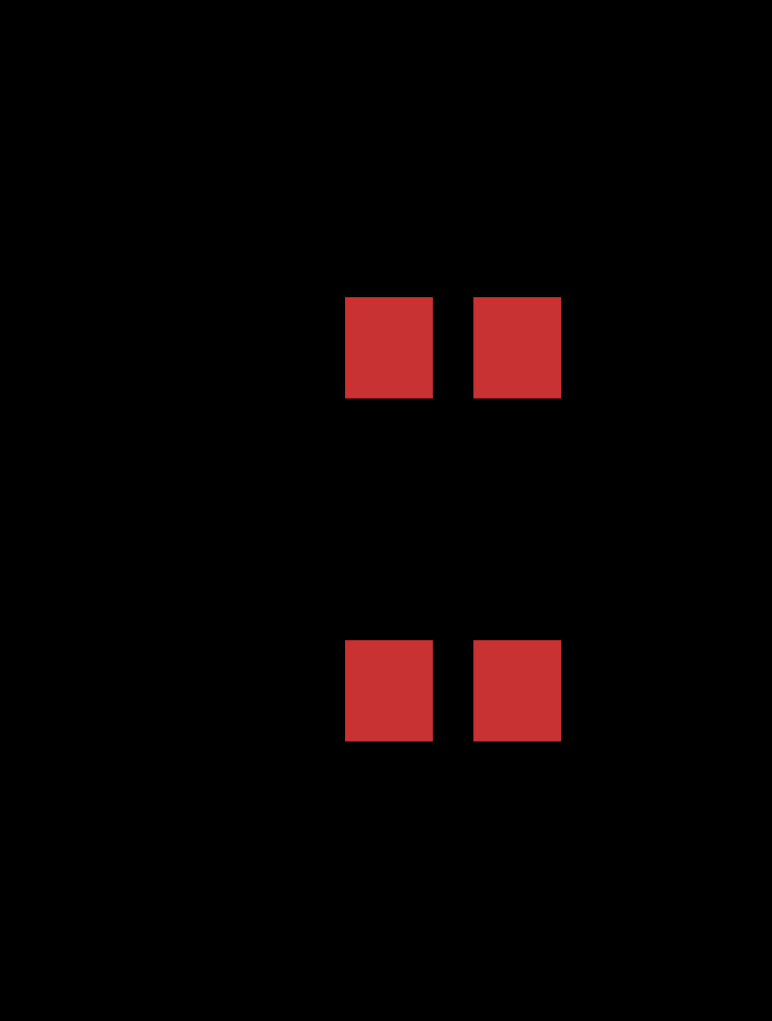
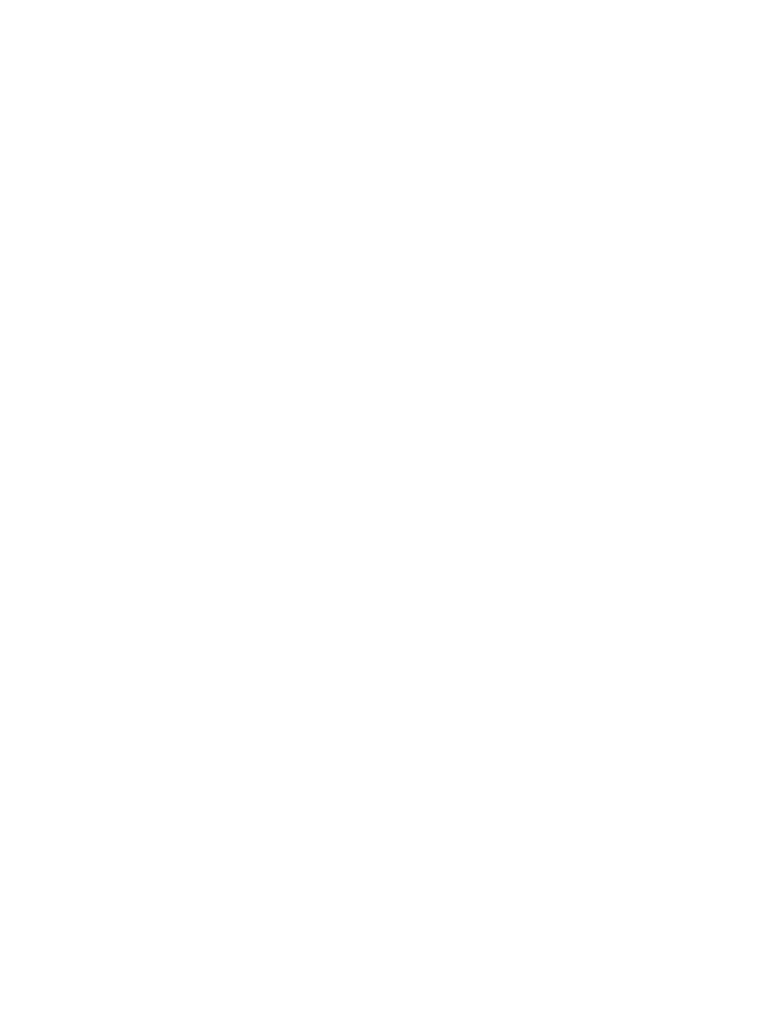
part: (453, 347) -> none
part: (453, 690) -> none

